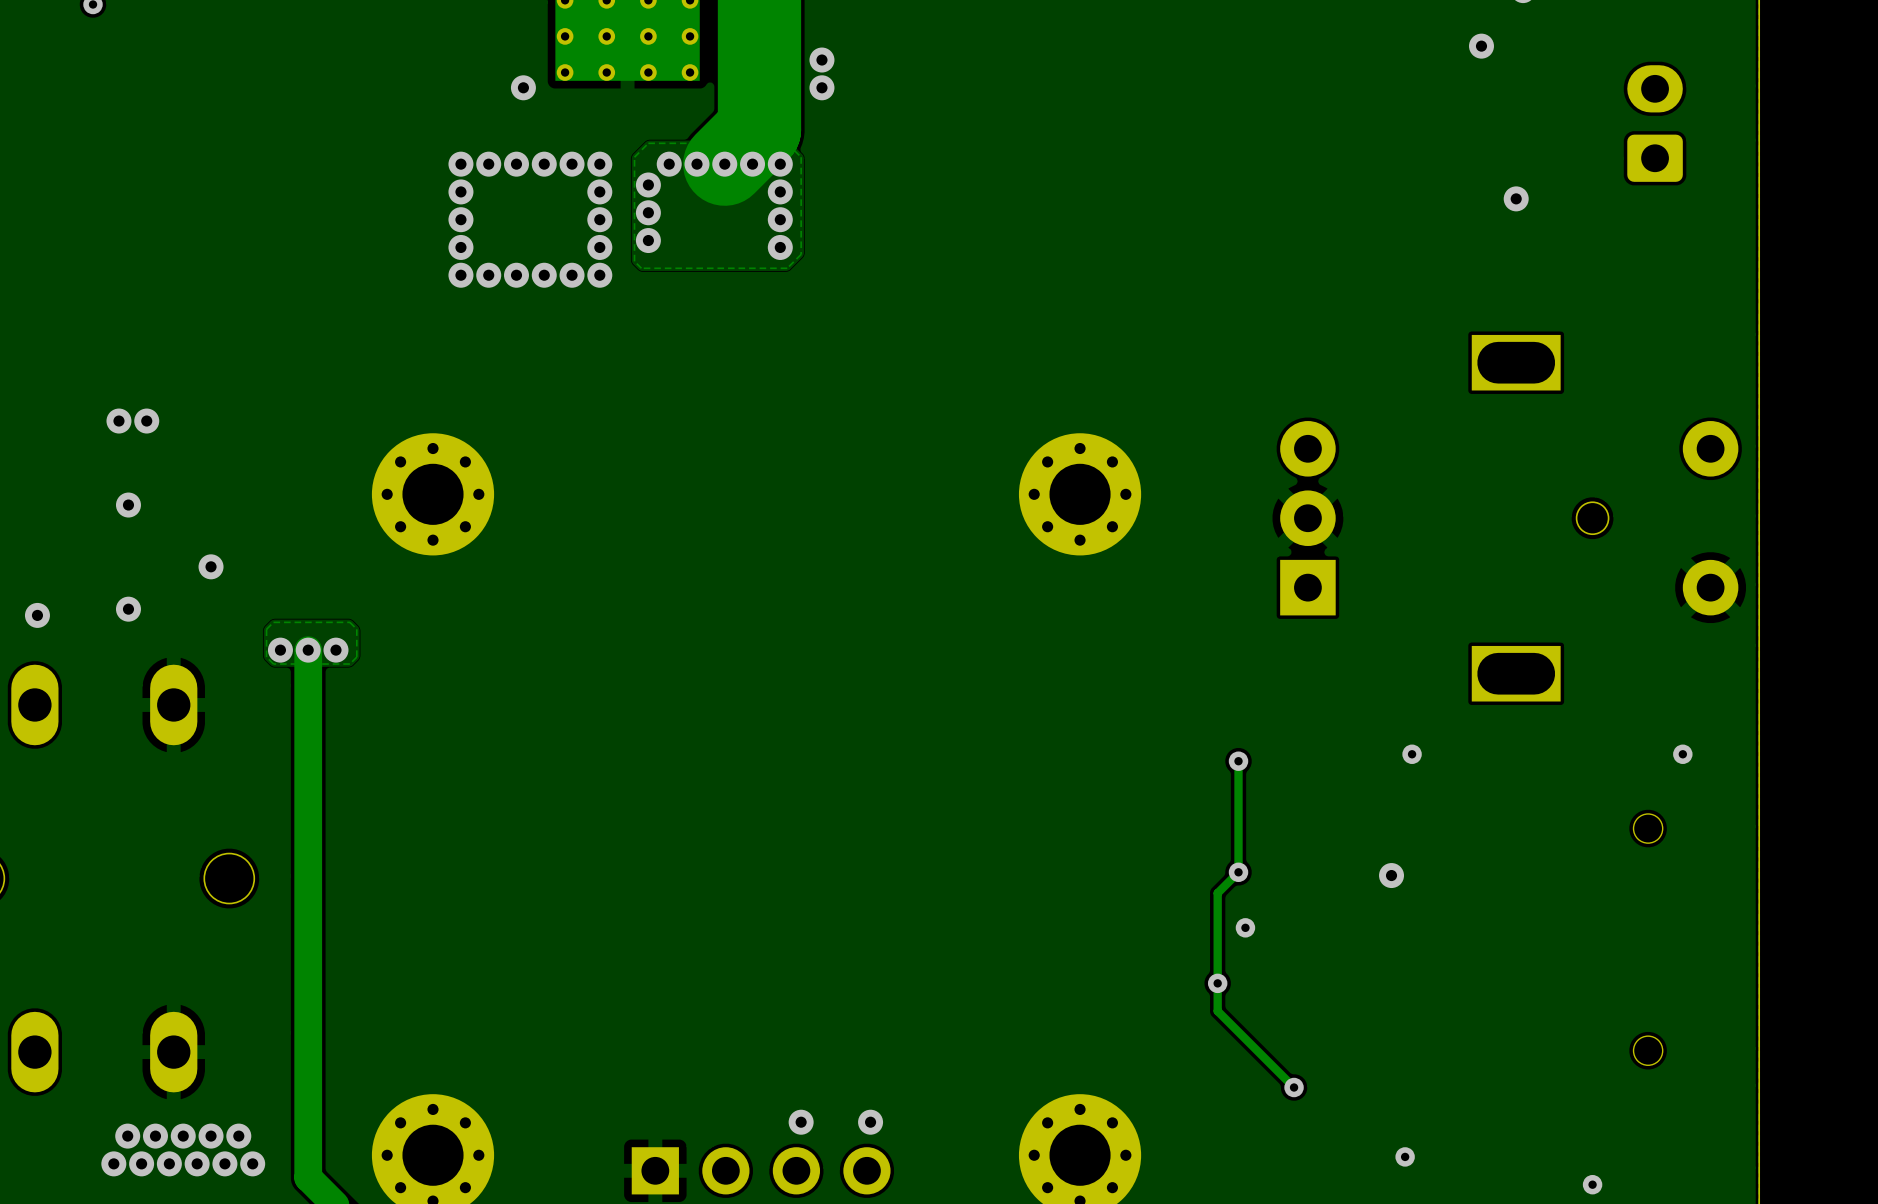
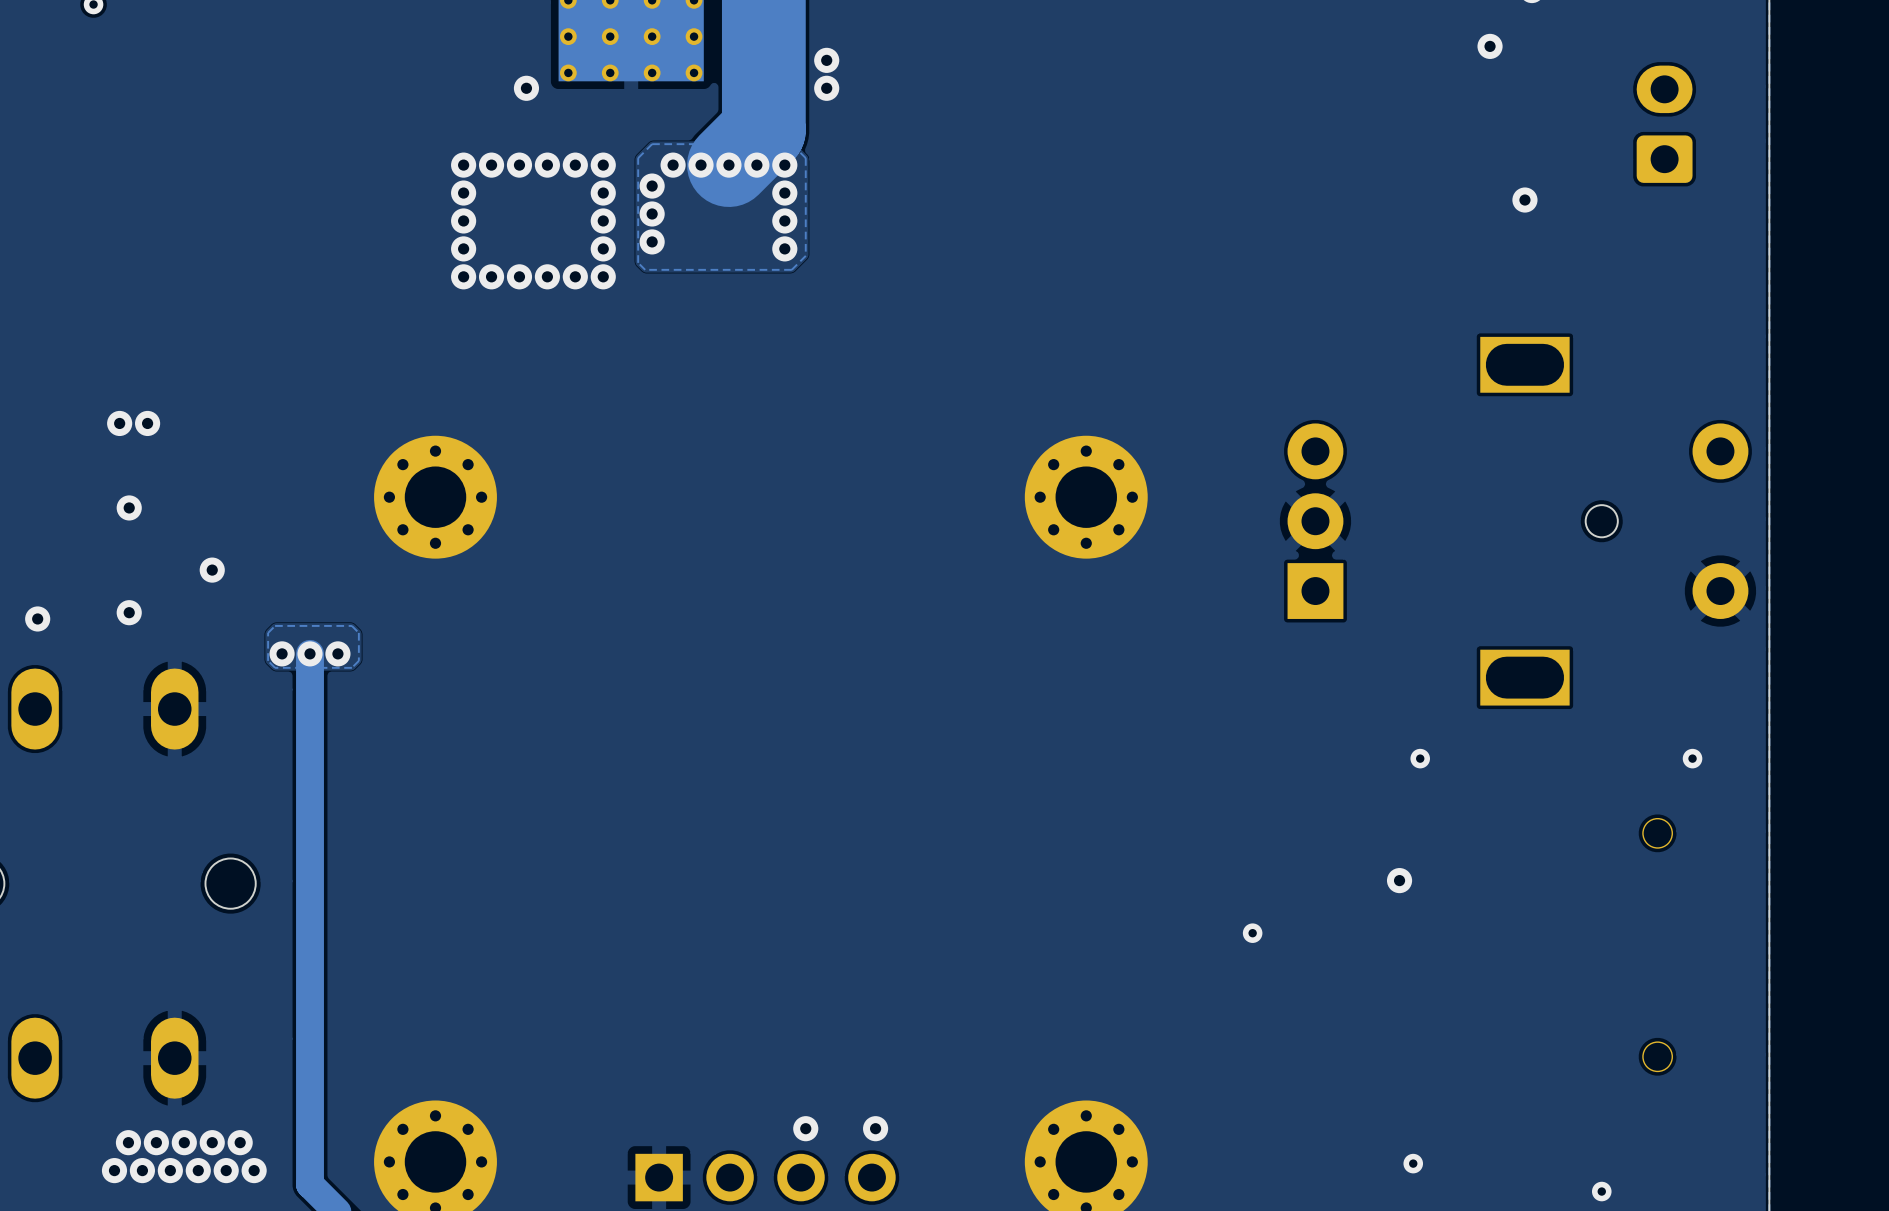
track: (1238, 761) (1238, 872) (1217, 893) (1217, 1011) (1294, 1087) -> none
via: (1238, 761) -> none
via: (1238, 872) -> none
via: (1217, 983) -> none
via: (1294, 1087) -> none

